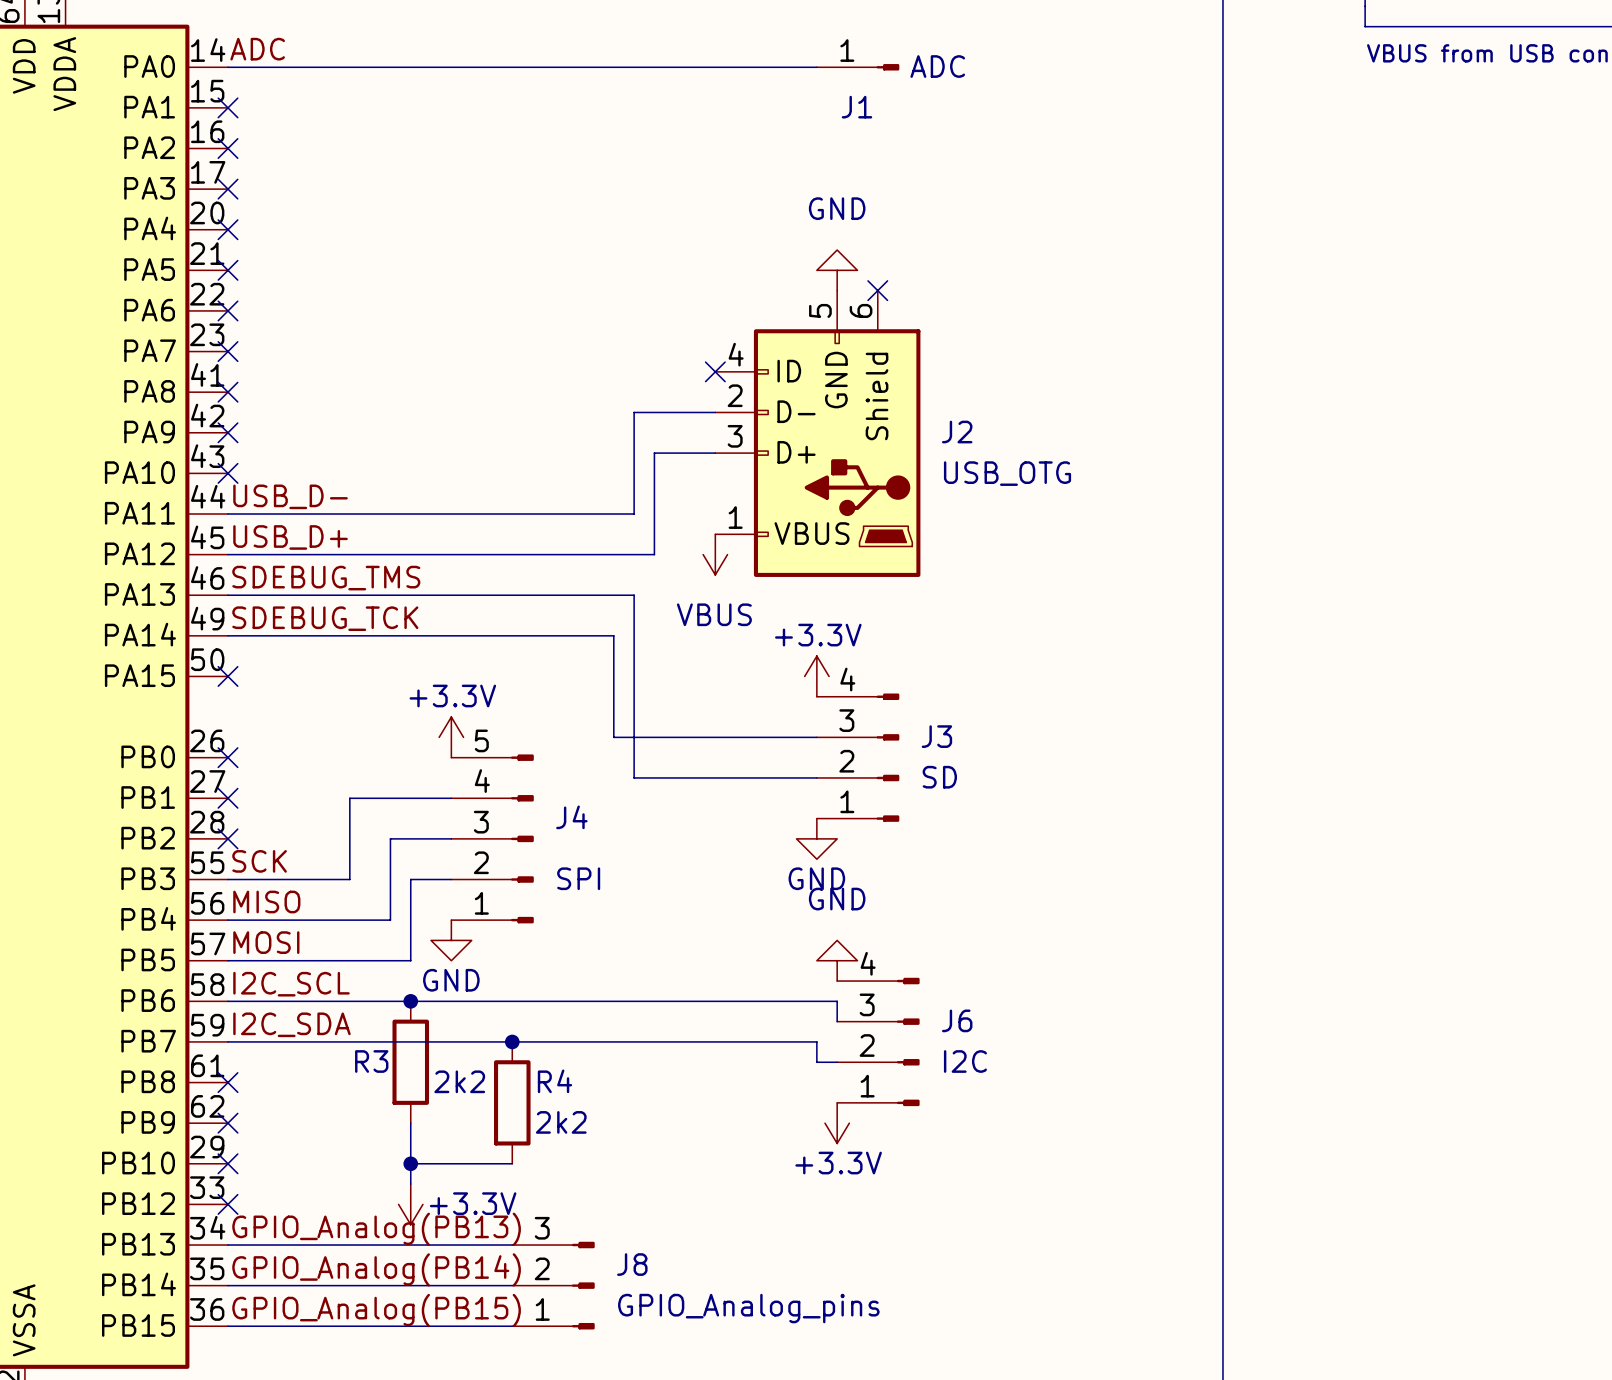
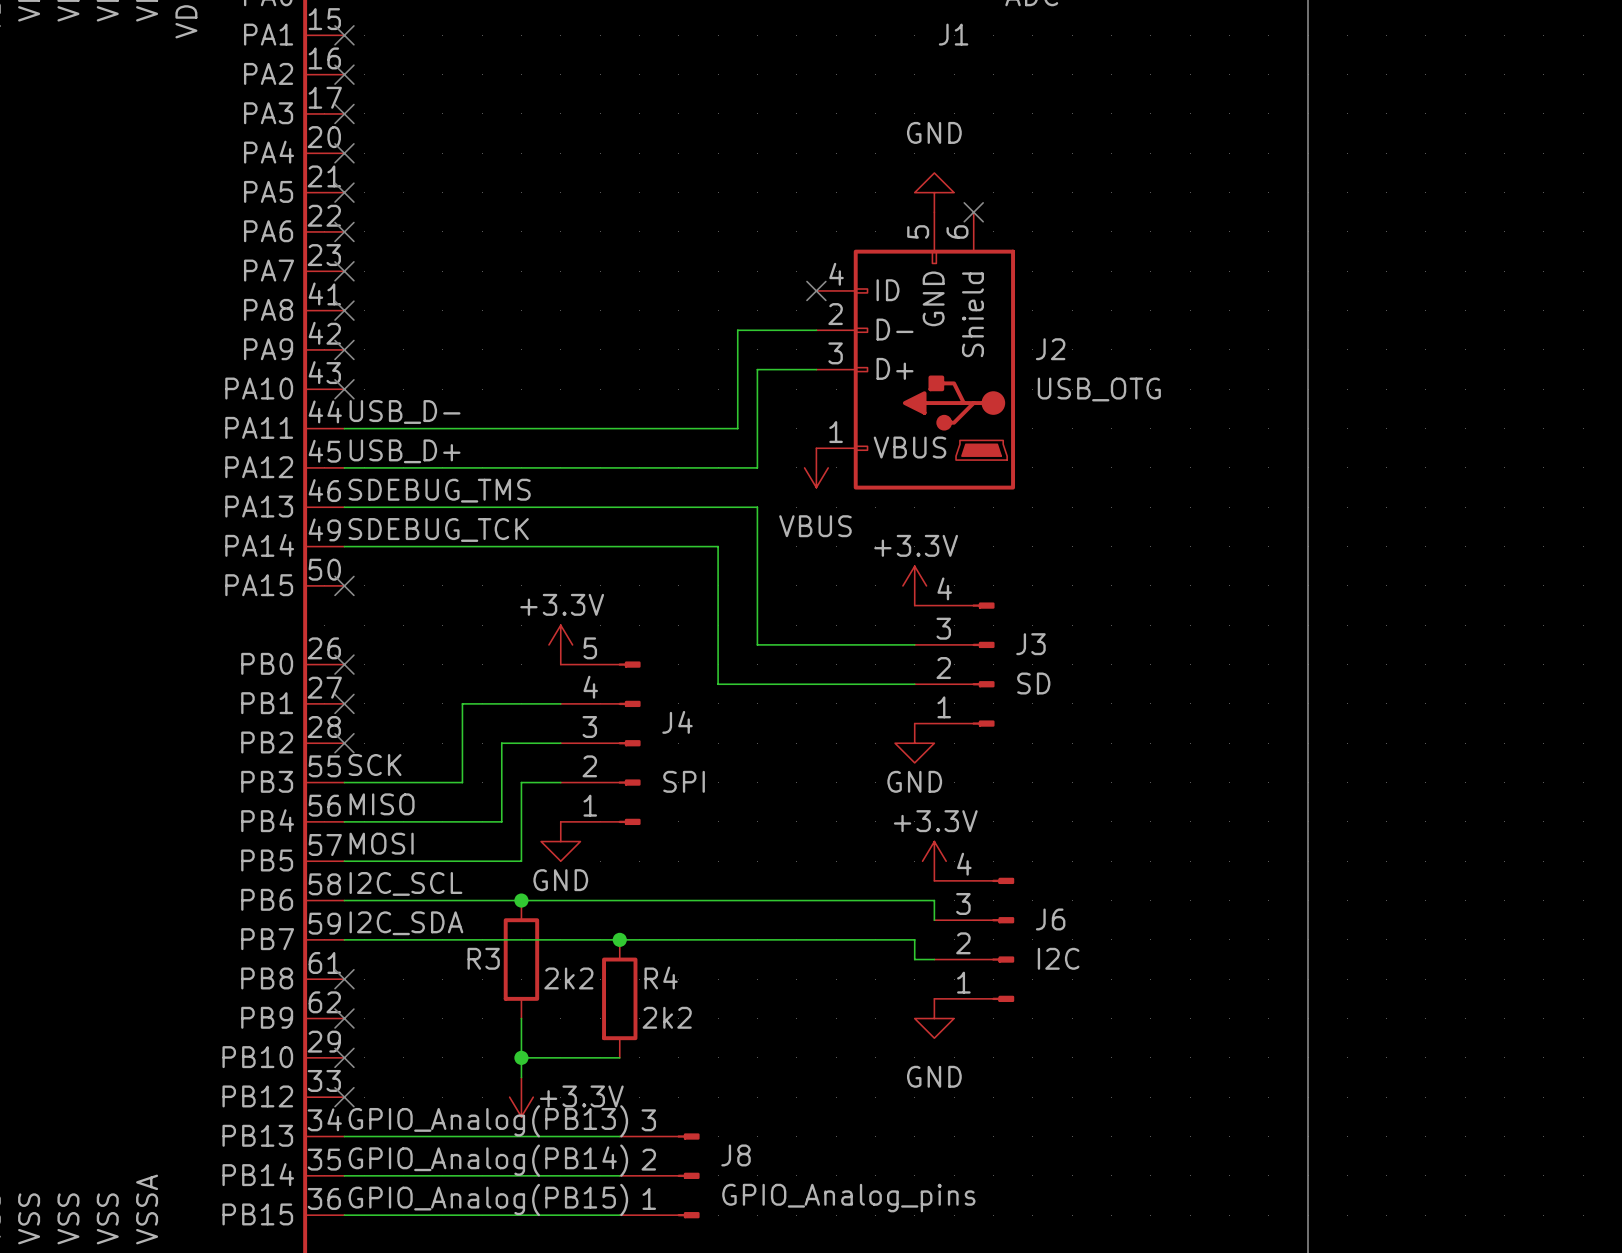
wire: (634, 595) (634, 777) -> (737, 507) (757, 507) (757, 644)
wire: (613, 737) (654, 737) -> (718, 644) (718, 684) (737, 684)
power symbol: GND (837, 960) -> +3.3V (934, 861)
power symbol: +3.3V (837, 1123) -> GND (934, 1018)

